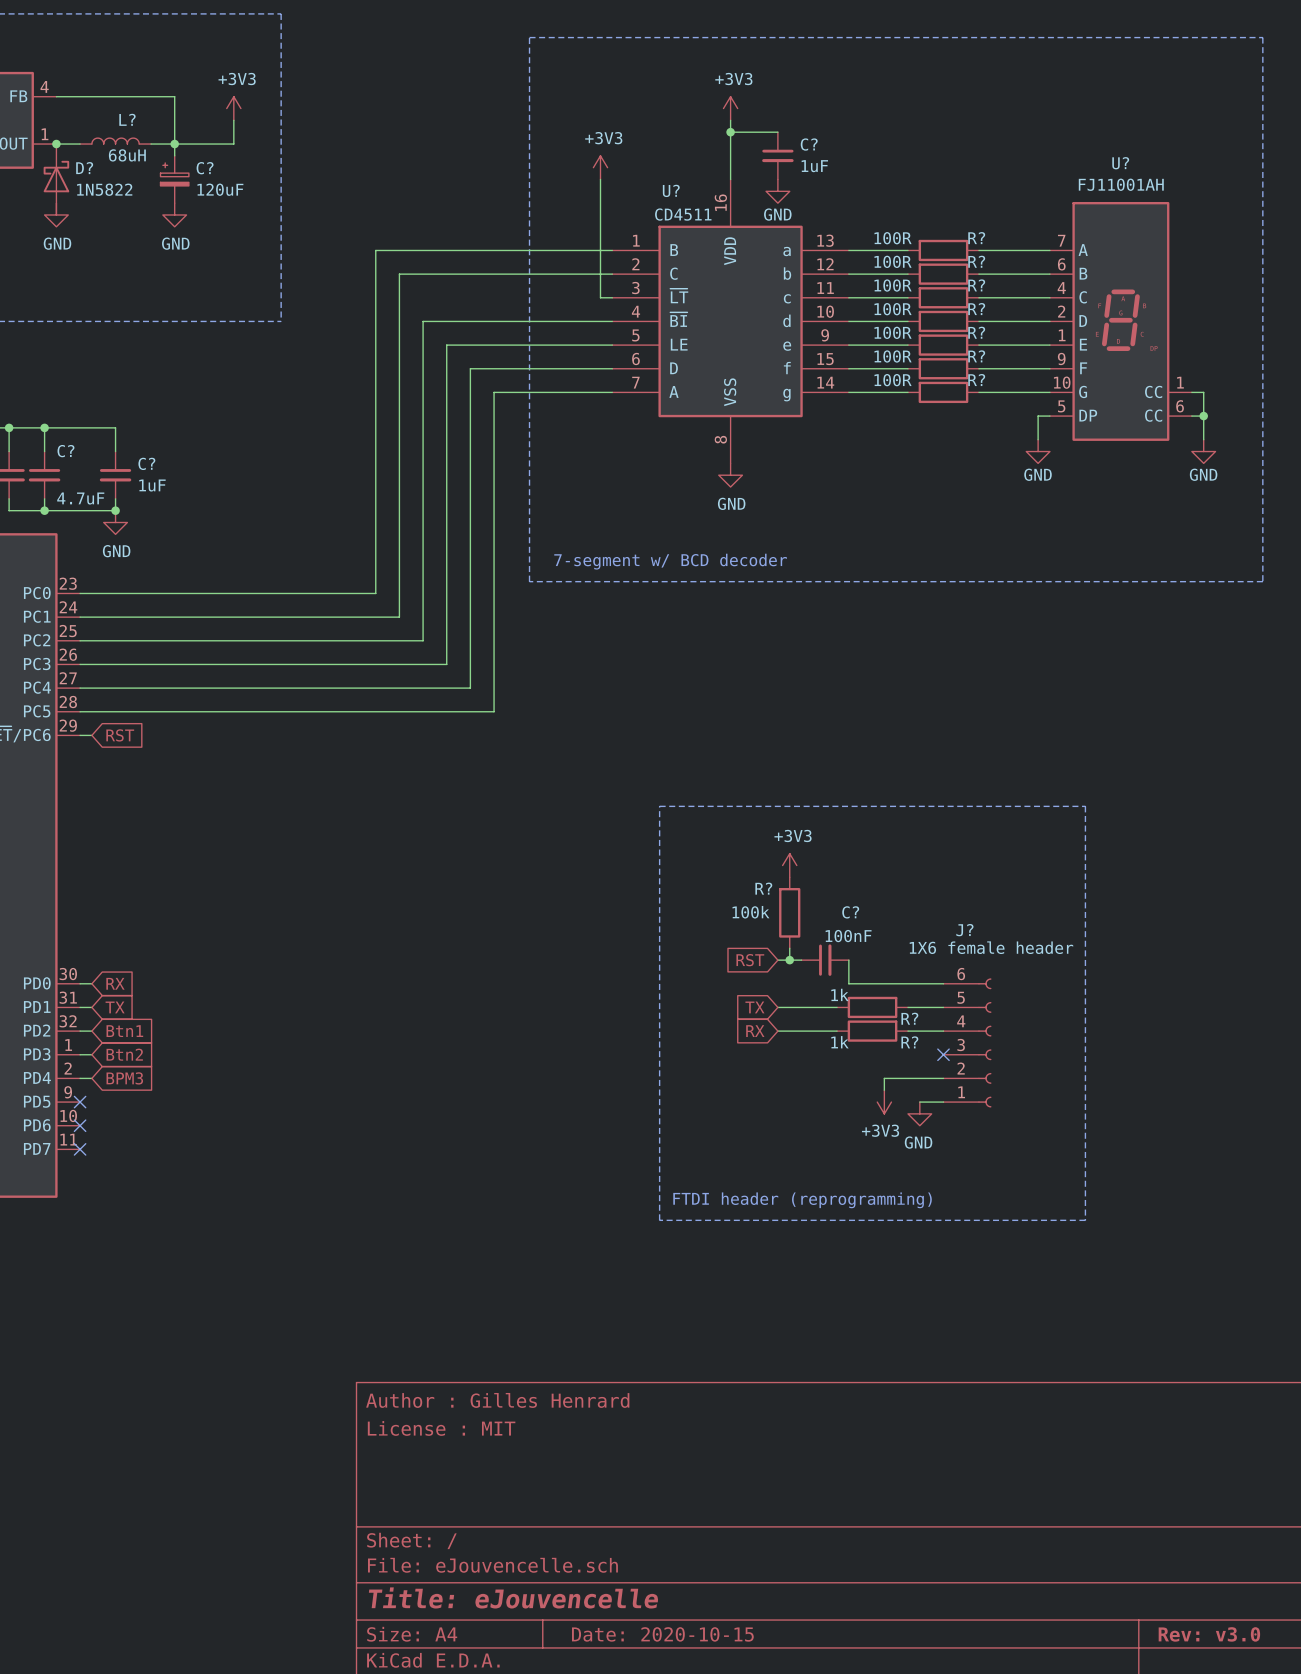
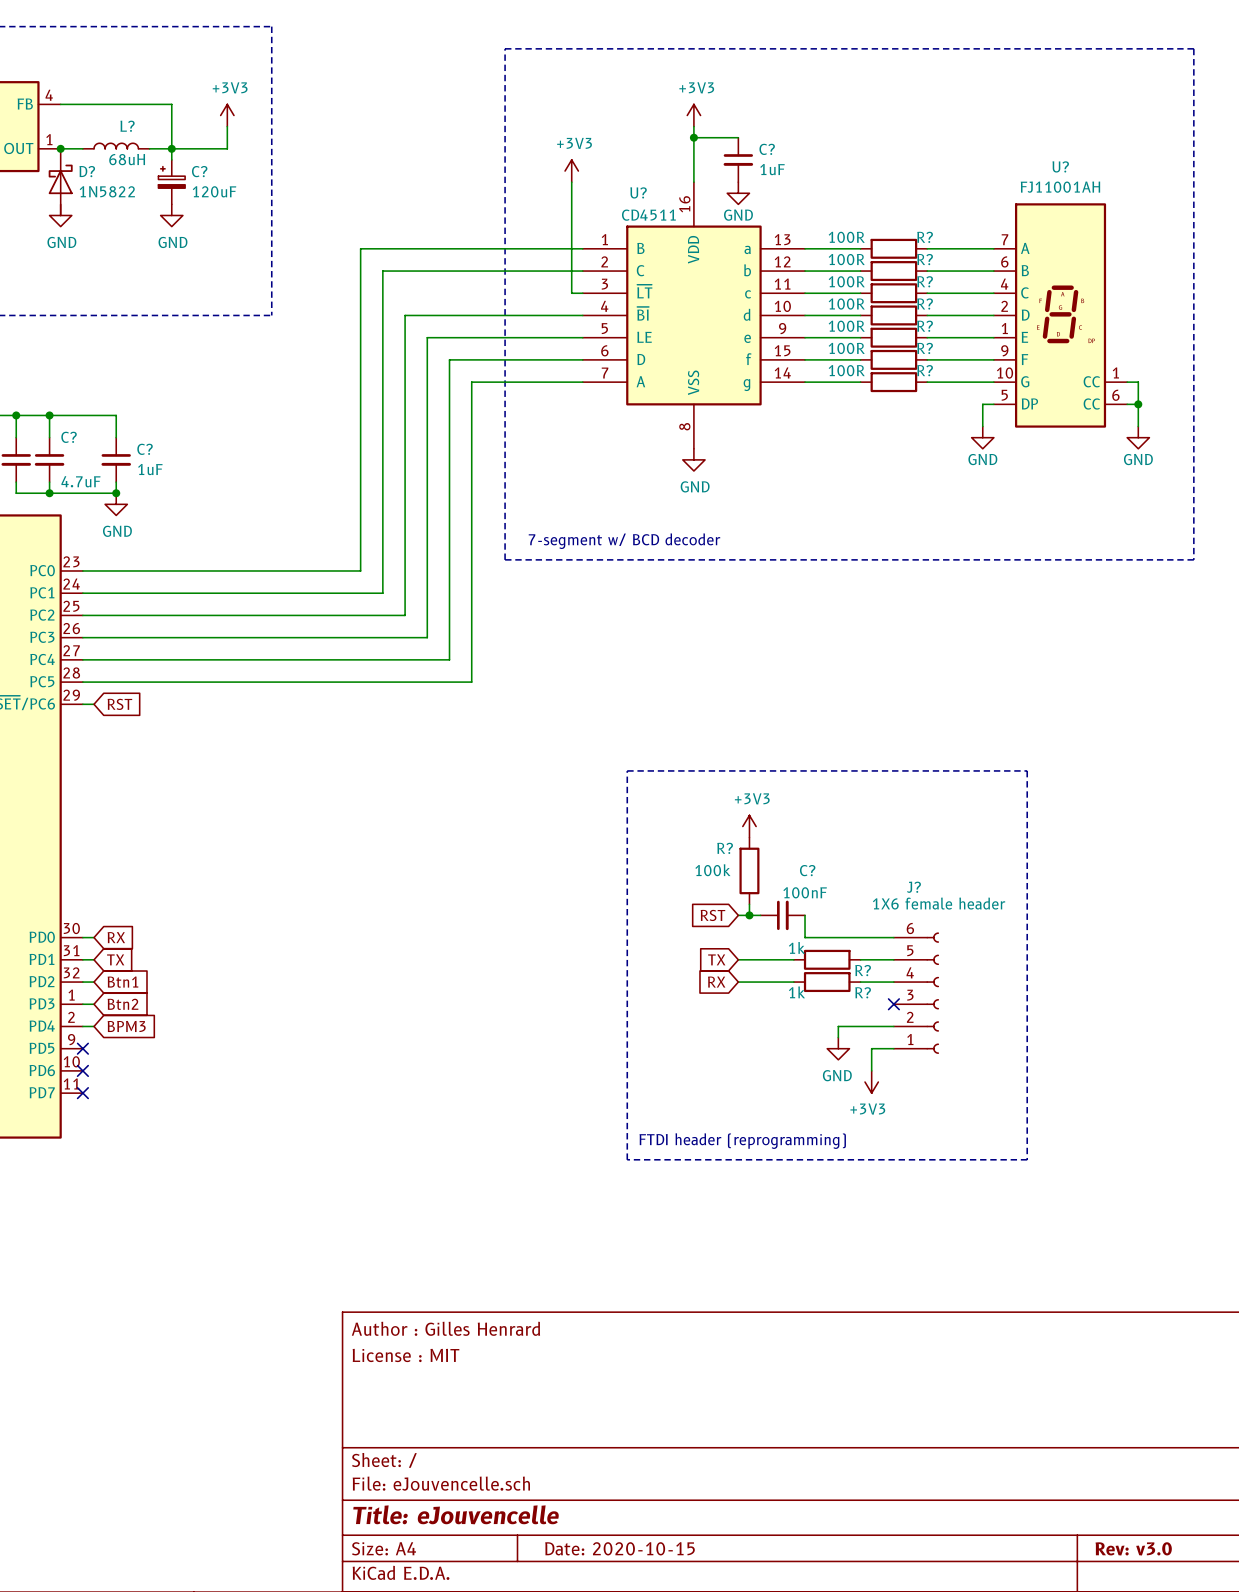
power symbol: +3V3 (884, 1102) -> GND (838, 1048)
power symbol: GND (919, 1113) -> none
power symbol: none -> +3V3 (871, 1082)

